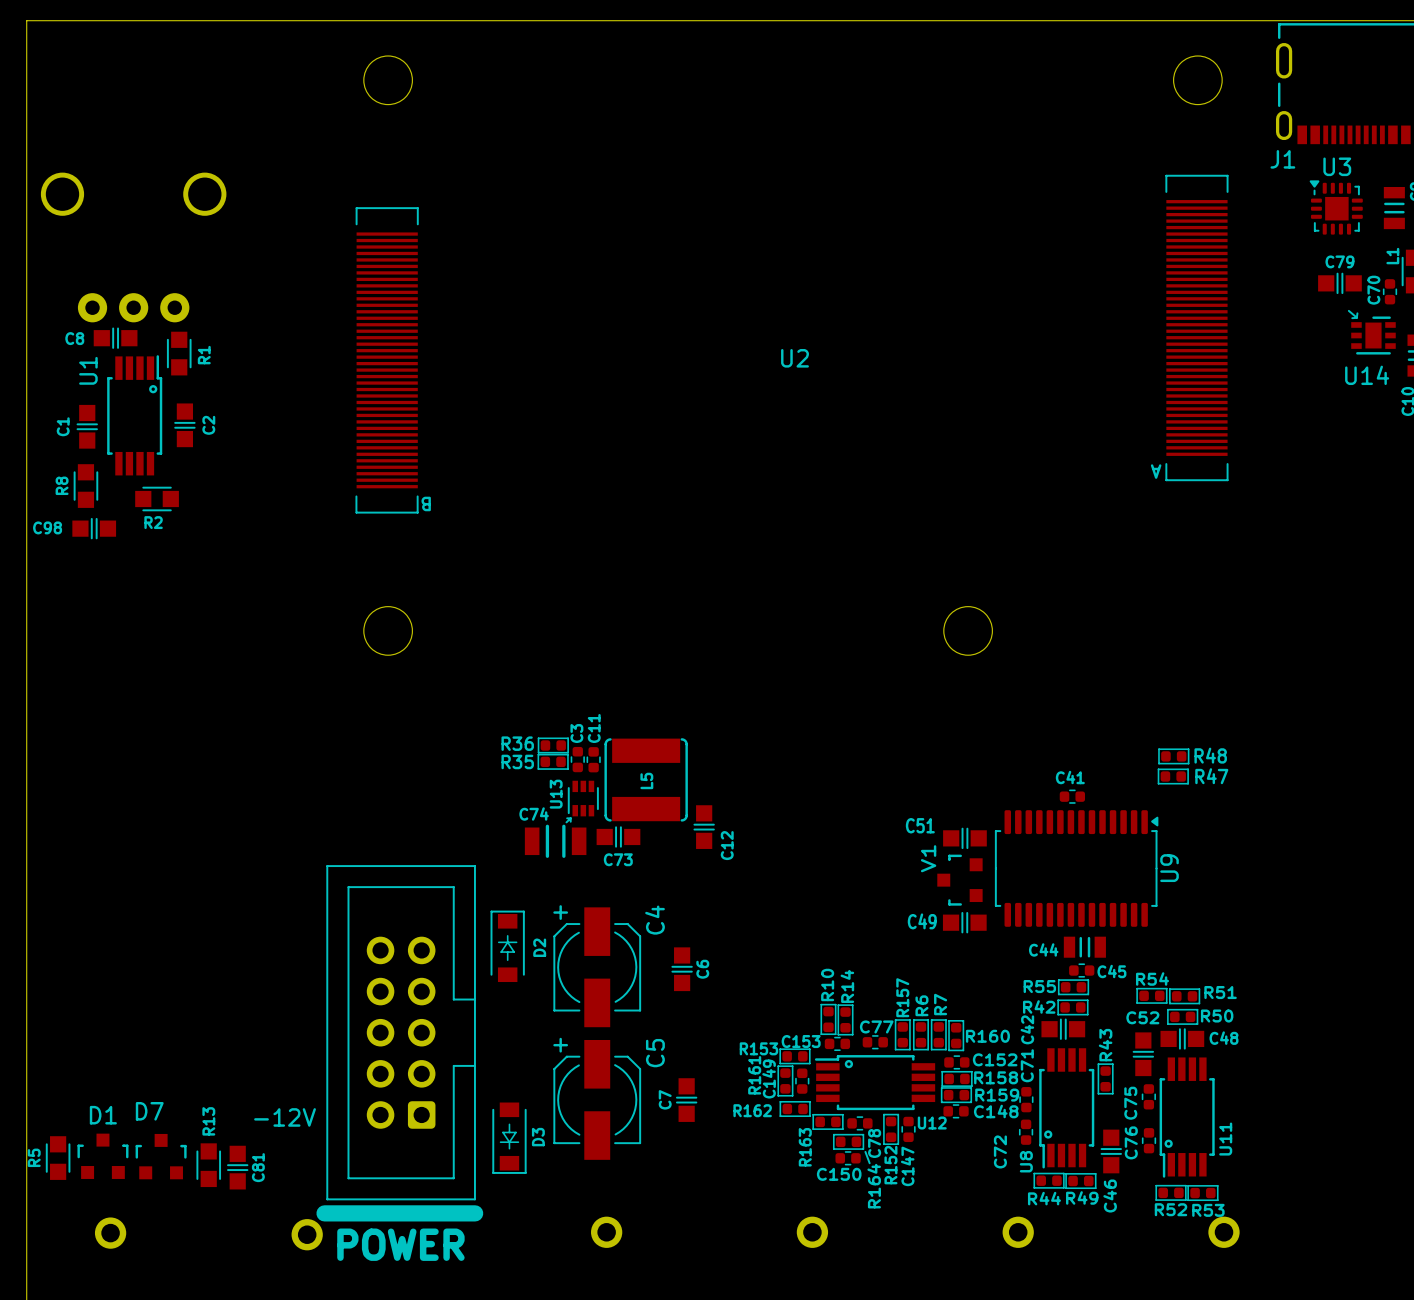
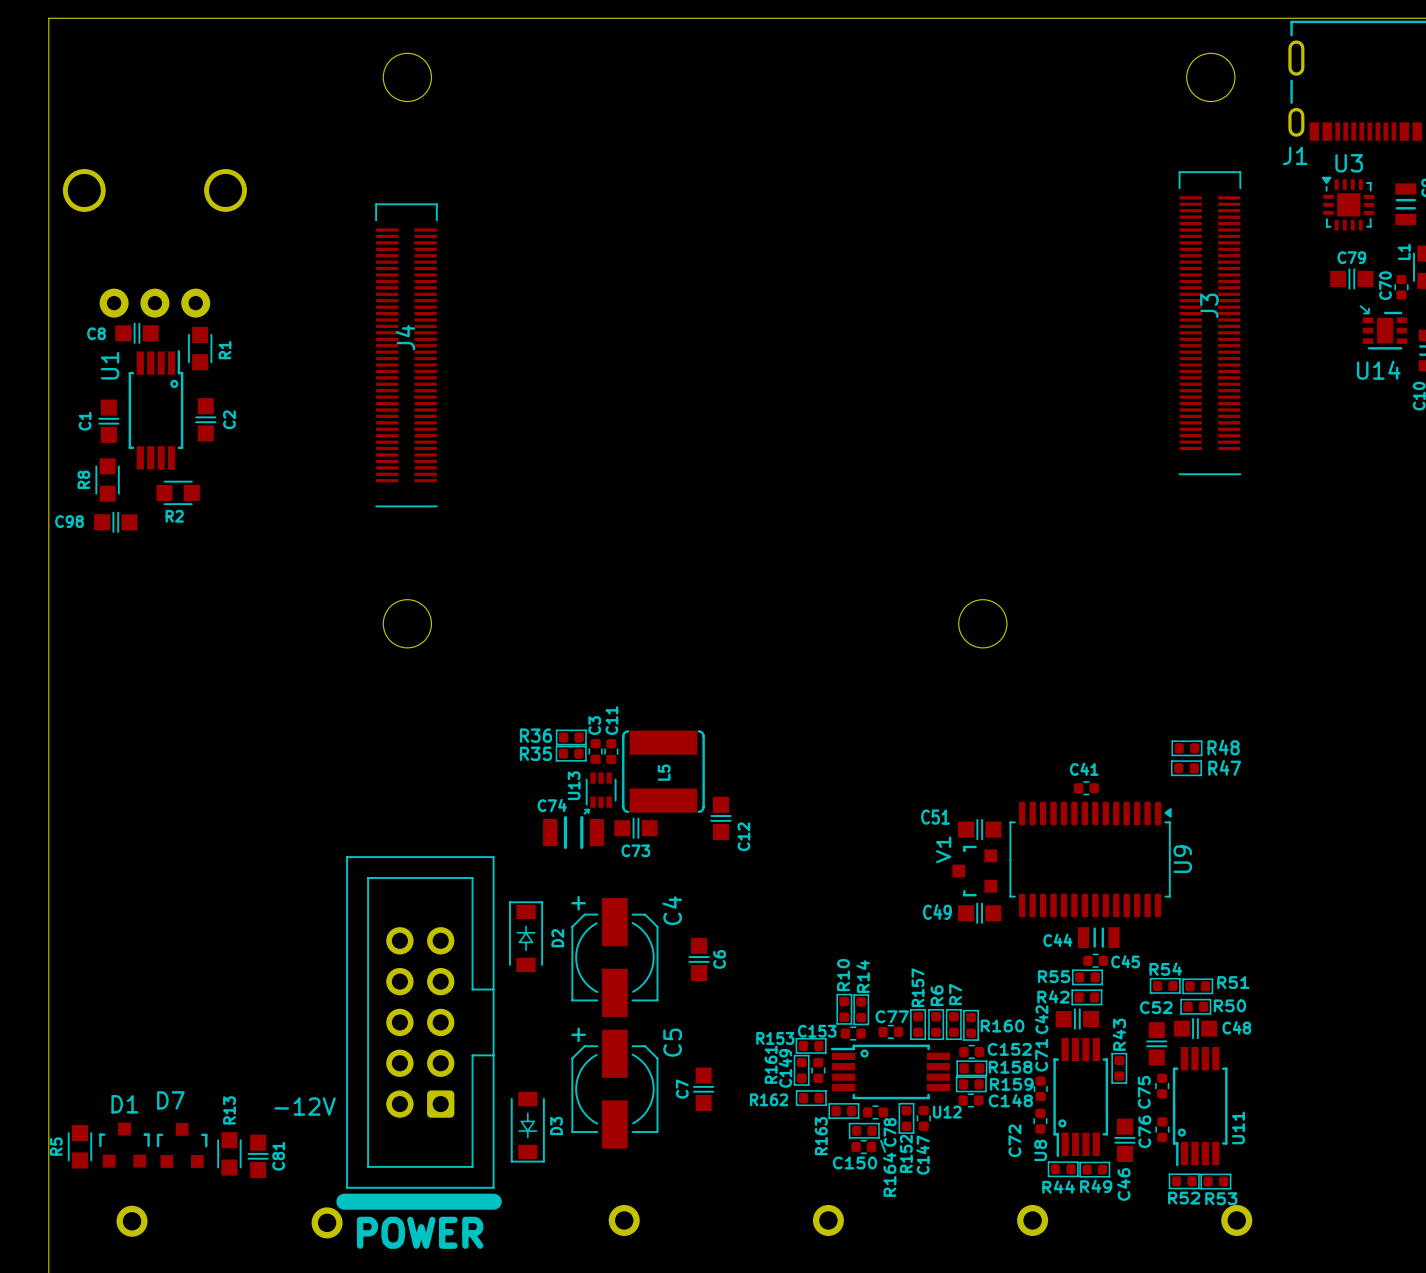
J3: none -> (1209, 323)
U2: (791, 355) -> none
J4: none -> (406, 355)

